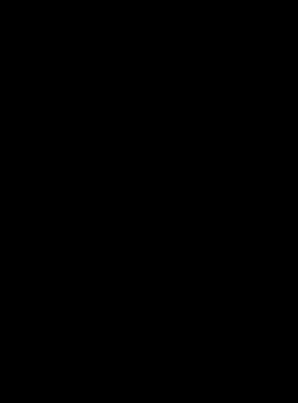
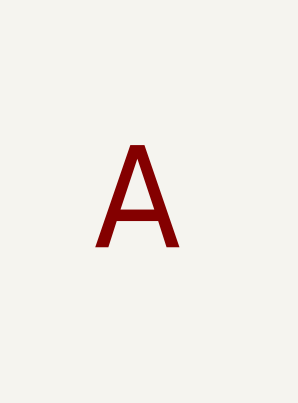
text: none -> A (137, 196)

